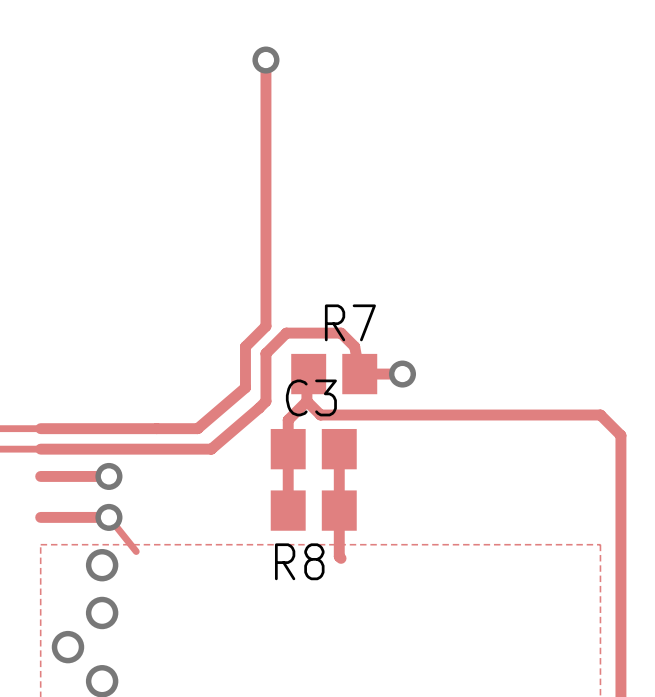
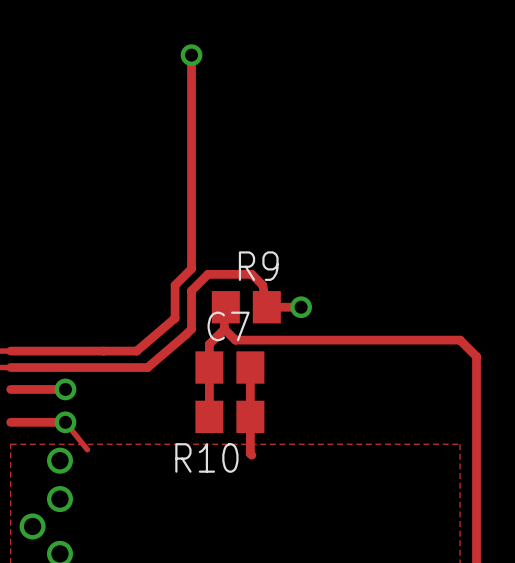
R7 name: R7 (350, 322) -> R9 (258, 266)
C3 name: C3 (311, 397) -> C7 (228, 326)
R8 name: R8 (299, 561) -> R10 (206, 457)

